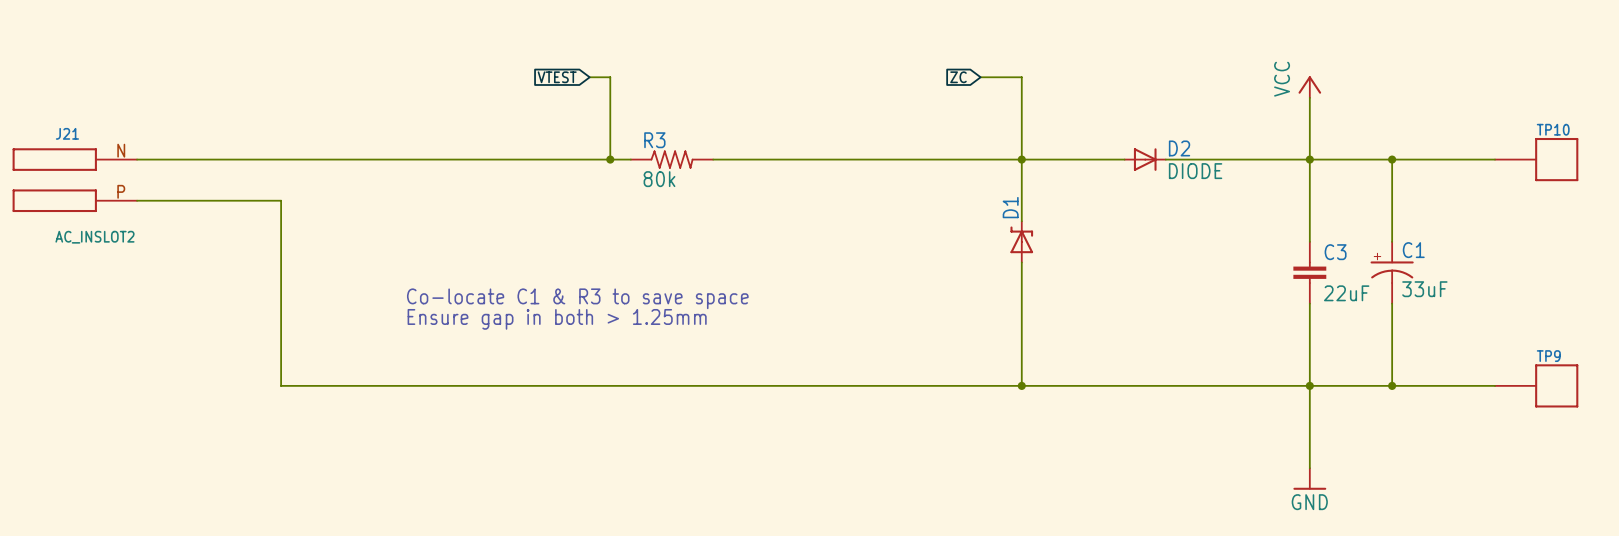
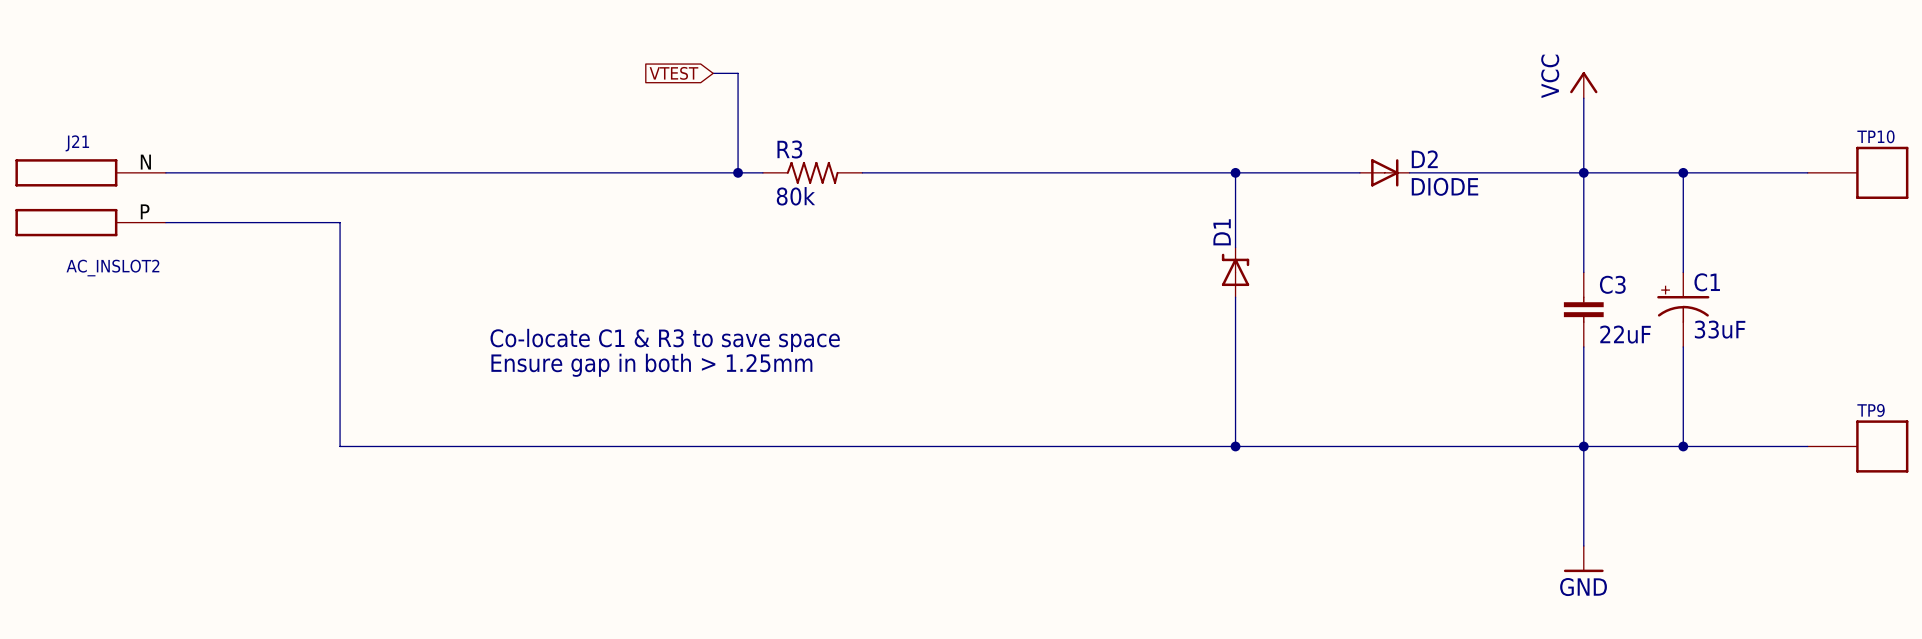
global label: ZC (958, 77) -> none
wire: (980, 77) (1021, 77) (1021, 159) -> none

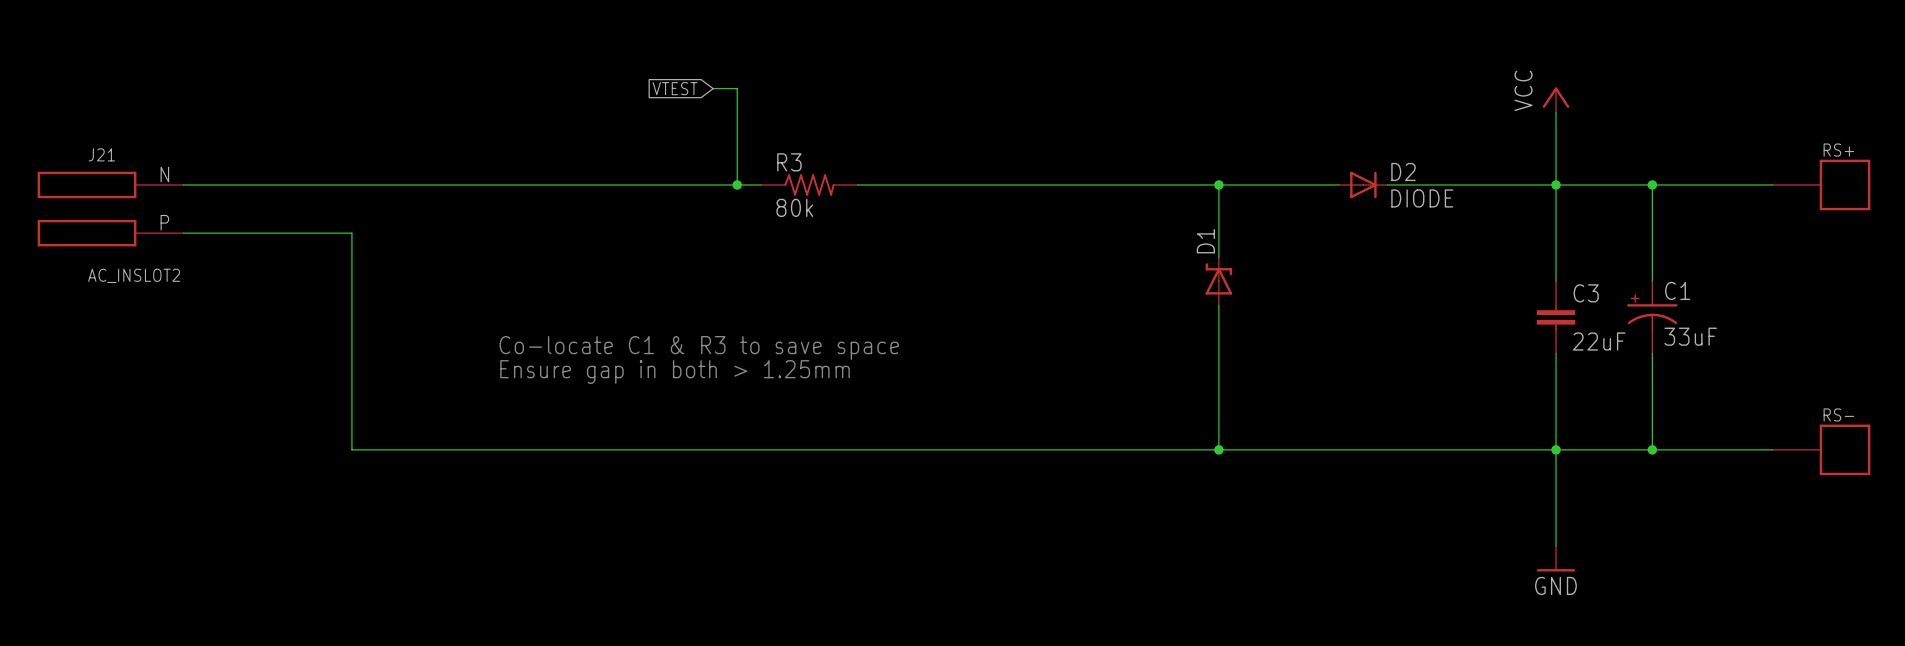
TP10 name: TP10 (1875, 136) -> RS+ (1838, 150)
TP9 name: TP9 (1871, 410) -> RS- (1838, 414)

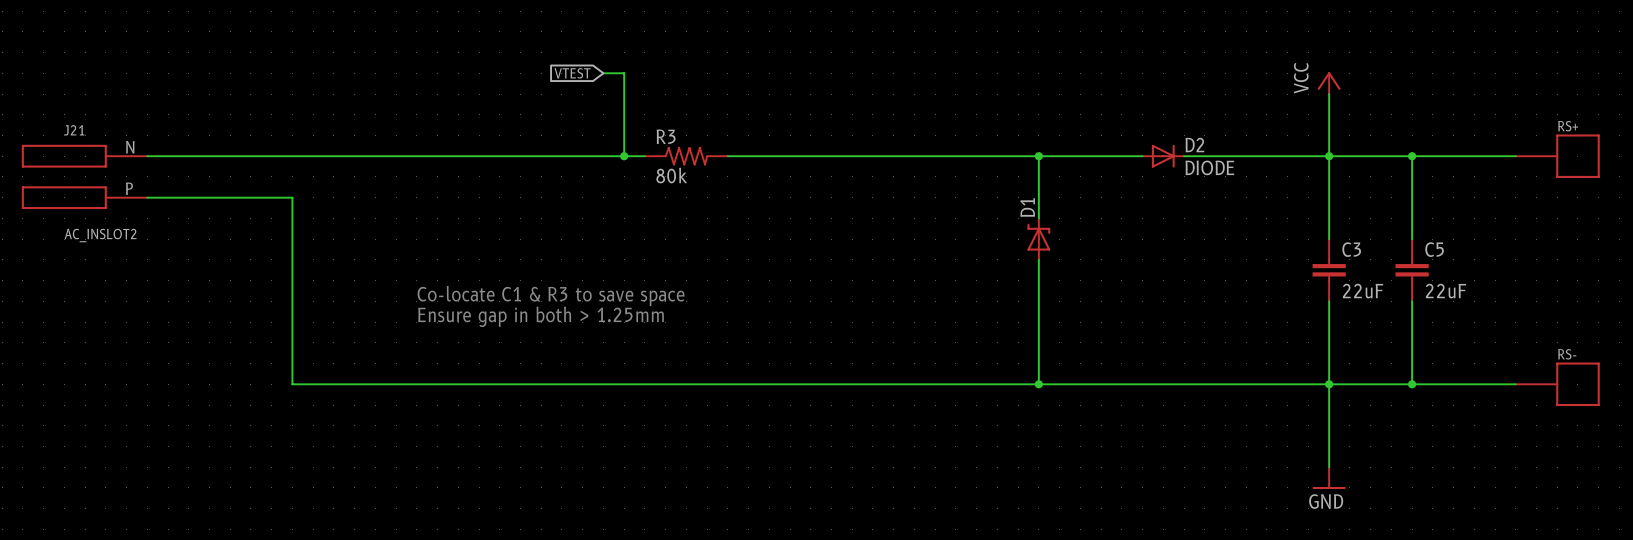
C1: 33uF (1652, 317) -> none
C5: none -> 22uF (1412, 270)

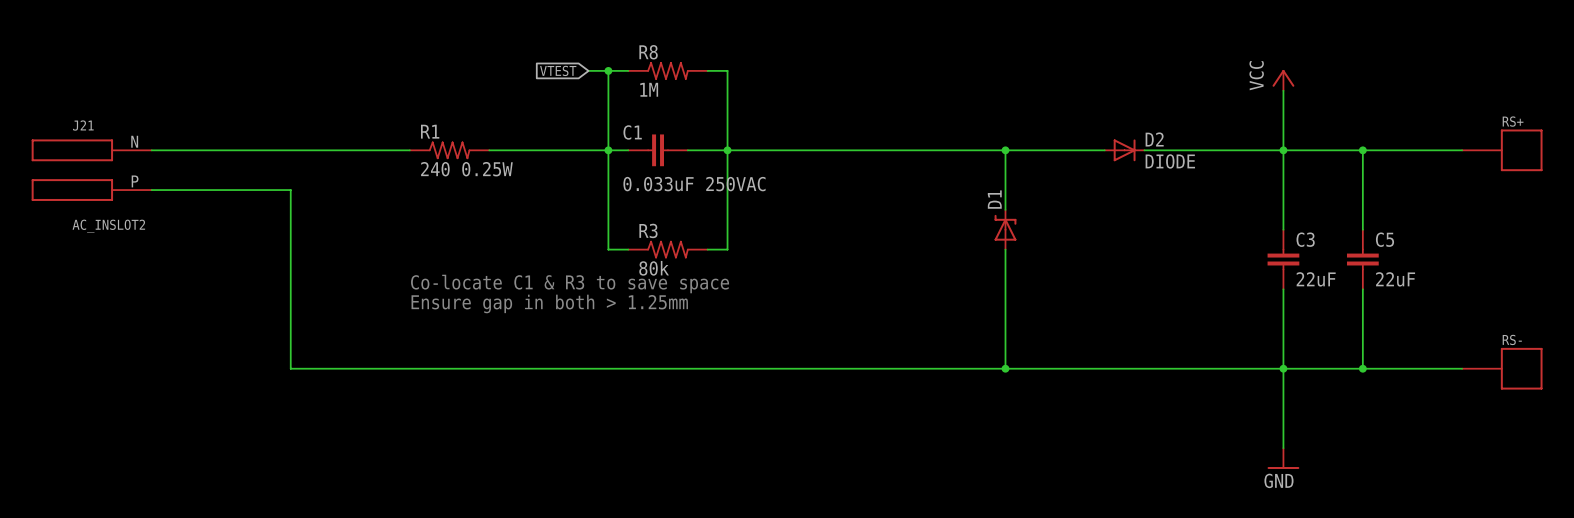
wire: none -> (608, 70) (628, 70)
junction: none -> (608, 70)
R8: none -> 1M (667, 70)
wire: none -> (707, 70) (727, 70) (727, 249) (707, 249)
R1: none -> 240 0.25W (449, 150)
wire: none -> (608, 150) (608, 249) (628, 249)
C1: none -> 0.033uF 250VAC (658, 150)
R3 position: (686, 156) -> (667, 249)
junction: none -> (727, 150)

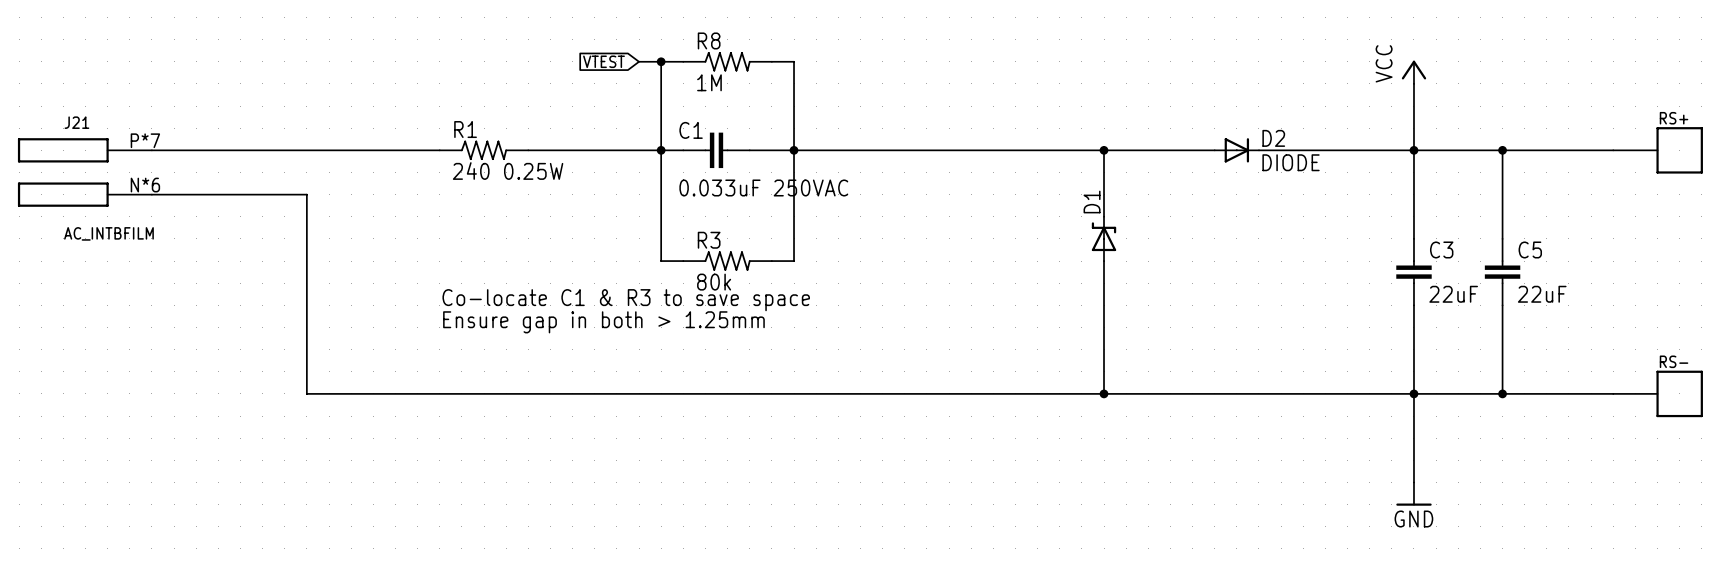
J21 pin number: N (134, 141) -> P*7 (145, 140)
J21 pin number: P (135, 181) -> N*6 (145, 185)
J21 value: AC_INSLOT2 (108, 226) -> AC_INTBFILM (108, 233)

